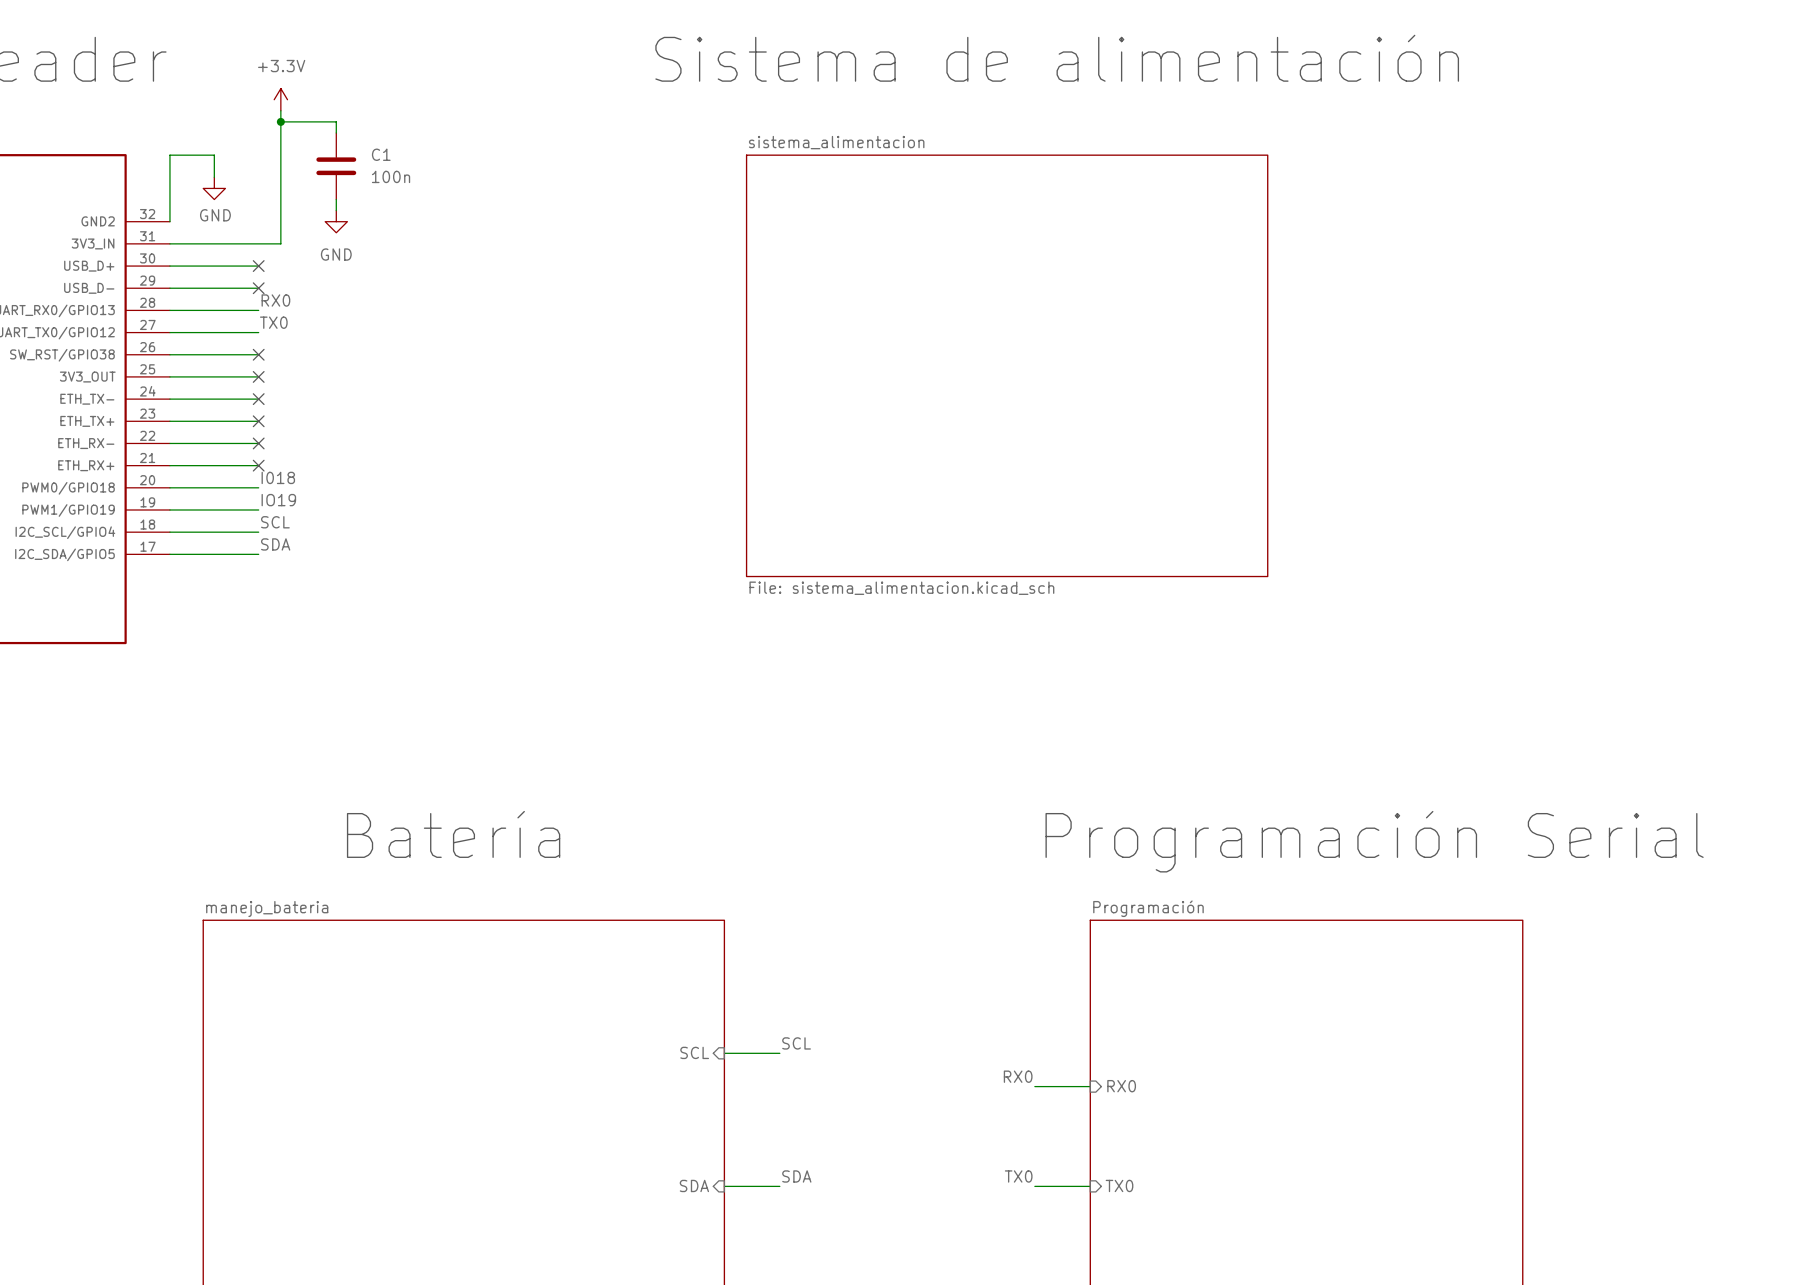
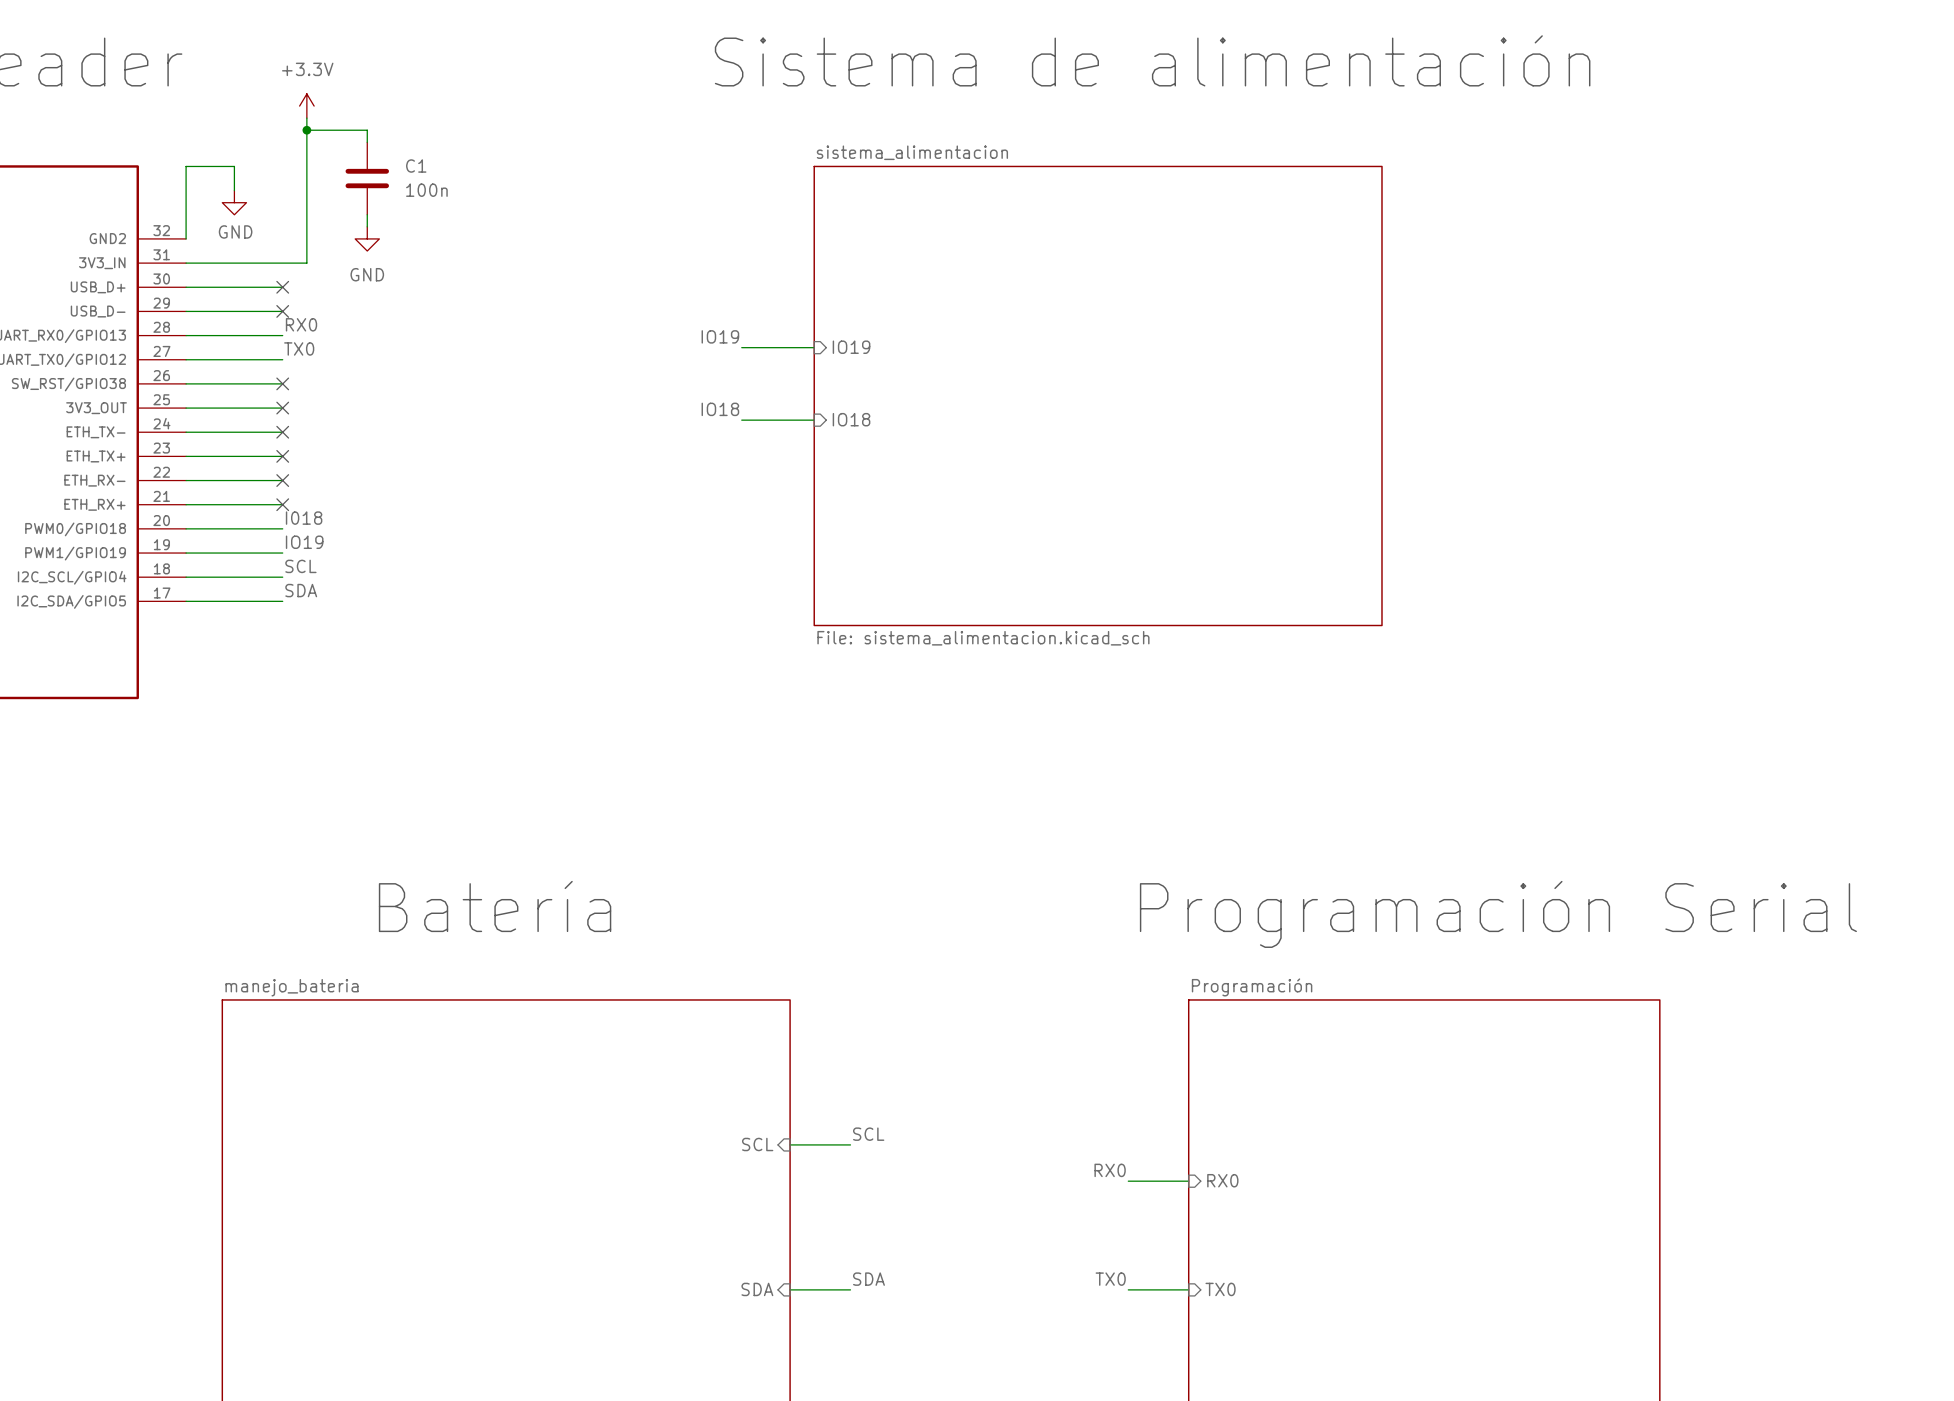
label: none -> IO19 (720, 336)
wire: none -> (741, 347) (814, 347)
sheet pin: none -> IO19 (851, 347)
label: none -> IO18 (720, 409)
sheet pin: none -> IO18 (851, 419)
wire: none -> (741, 420) (814, 420)

